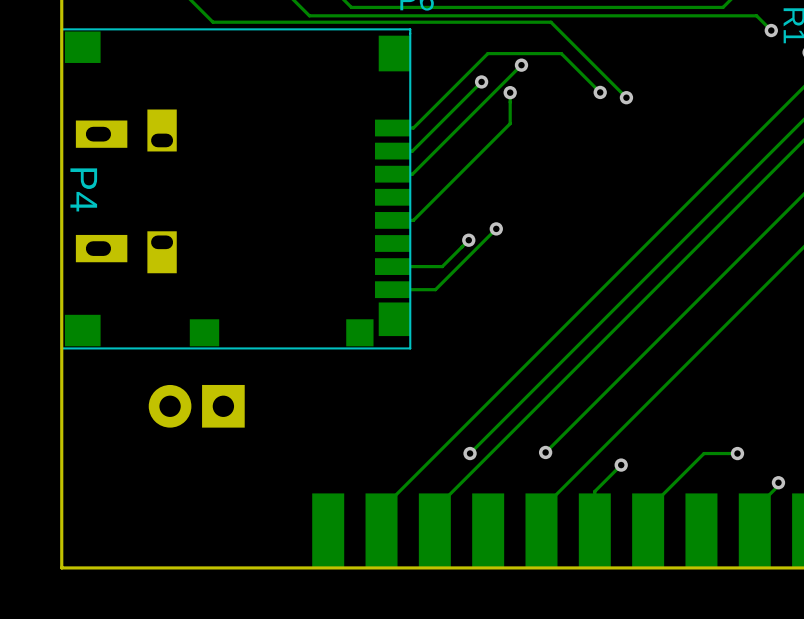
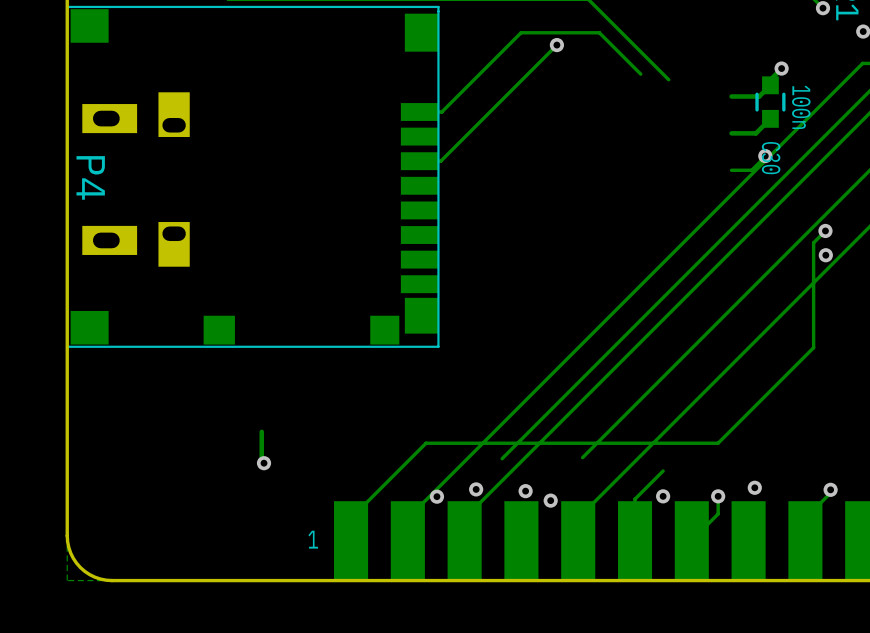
track: (481, 81) (412, 151) (392, 151) -> none
via: (481, 81) -> none
track: none -> (781, 68) (770, 79) (770, 85) (759, 96) (731, 96)
via: none -> (781, 68)
track: (510, 92) (510, 123) (413, 220) (392, 220) -> none
via: (510, 92) -> none
via: (600, 92) -> none
via: (626, 97) -> none
C30: none -> 100n (770, 102)
track: none -> (770, 118) (755, 133) (731, 133)
track: none -> (765, 156) (751, 170) (731, 170)
via: none -> (765, 156)
track: (496, 228) (435, 289) (392, 289) -> none
via: (496, 228) -> none
track: none -> (825, 230) (813, 242) (813, 347) (718, 443) (426, 443) (351, 518) (351, 540)
via: none -> (825, 230)
track: (468, 240) (442, 266) (392, 266) -> none
via: (468, 240) -> none
via: none -> (825, 255)
part: (196, 406) -> none
track: none -> (261, 431) (261, 460) (264, 463)
via: (545, 452) -> none
via: (470, 453) -> none
track: (737, 453) (704, 453) (648, 509) (648, 530) -> (718, 496) (718, 513) (691, 540)
via: (737, 453) -> none
via: none -> (264, 463)
via position: (621, 465) -> (663, 496)
via: none -> (754, 487)
via: none -> (476, 489)
via: none -> (525, 491)
via: none -> (718, 496)
via: none -> (436, 496)
via: none -> (550, 500)
board edge: (61, 525) (61, 567) (103, 567) -> (67, 535) (70, 552) (80, 567) (94, 577) (111, 580)
text: none -> 1 (313, 539)

